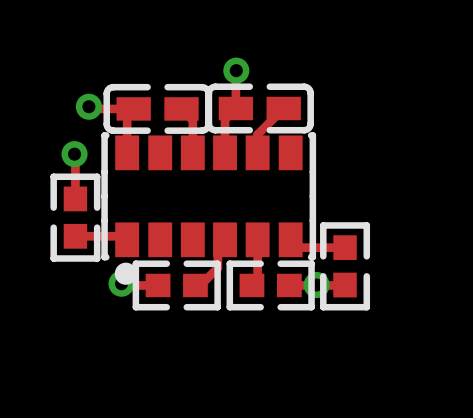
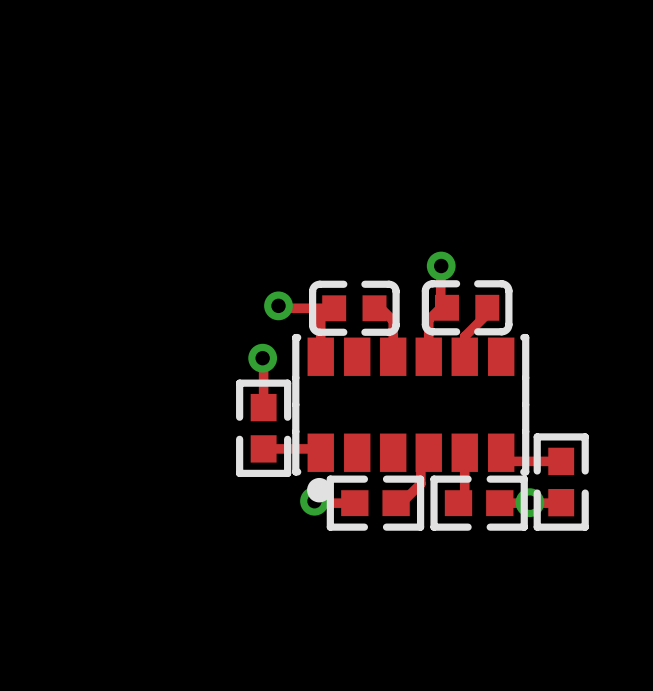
part footprint: [103, 83, 212, 134] -> [308, 280, 400, 336]
part footprint: [205, 83, 314, 134] -> [421, 280, 513, 336]

